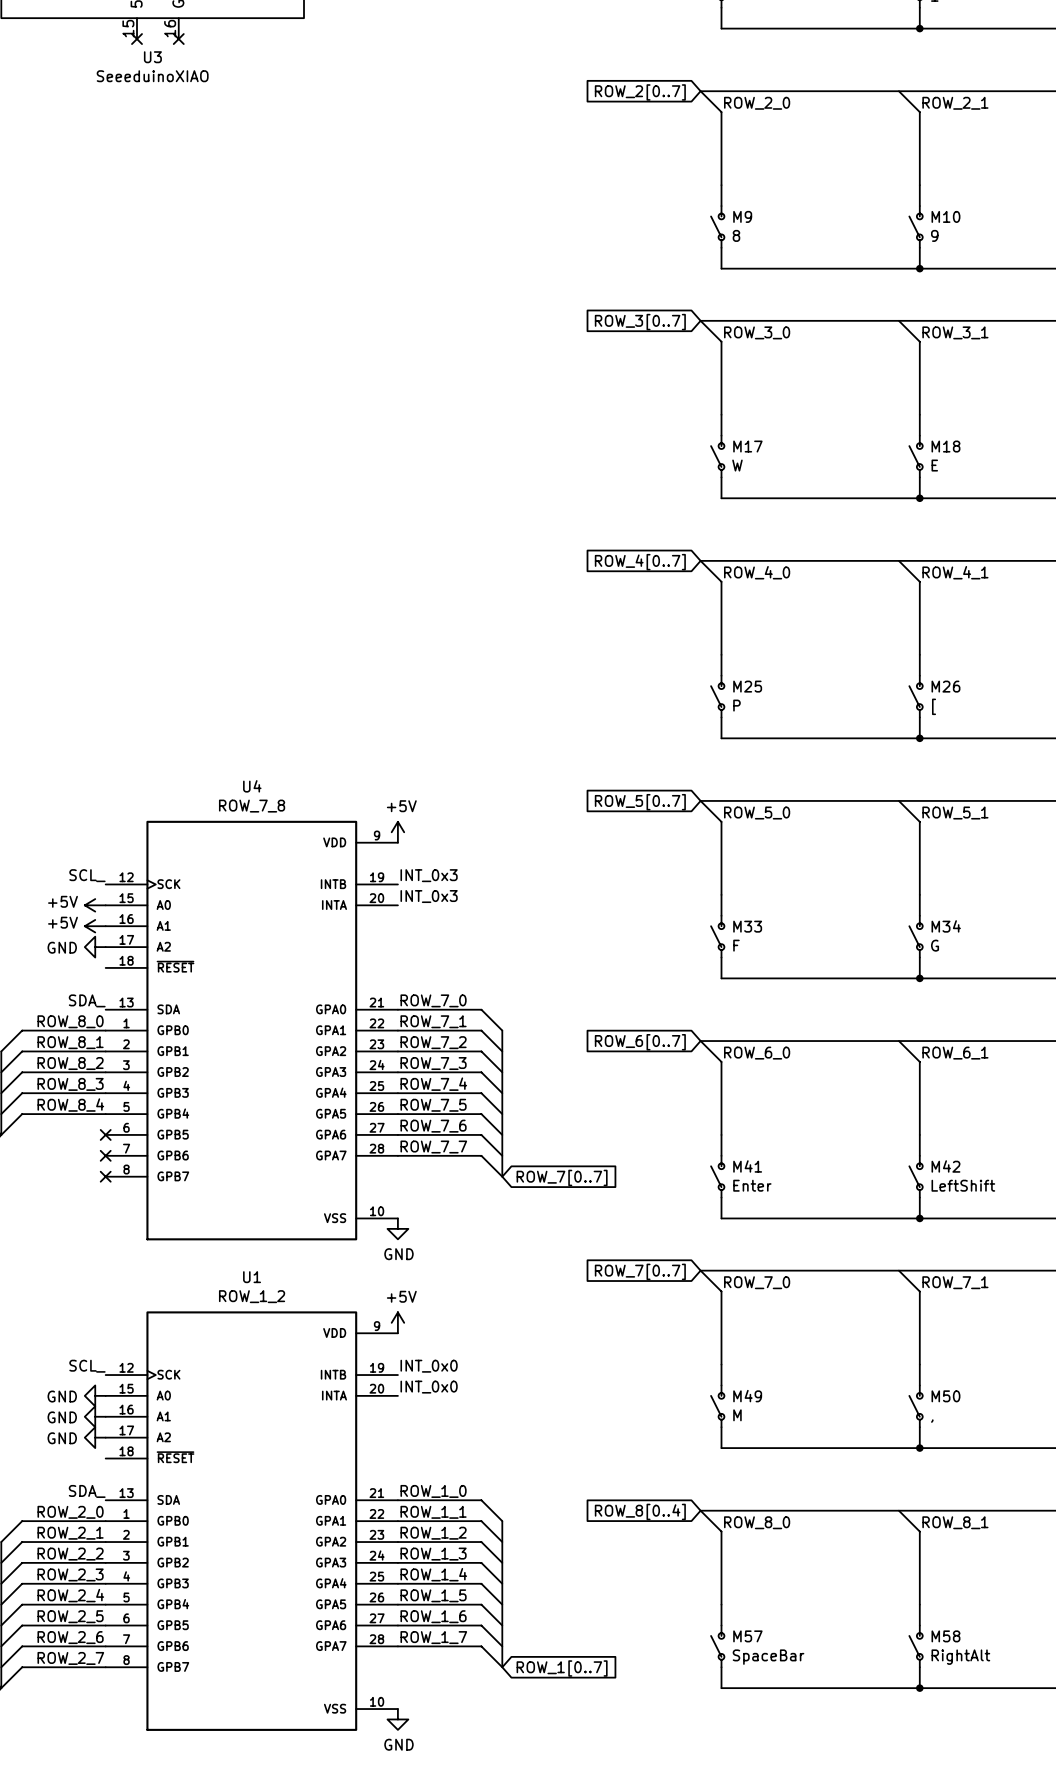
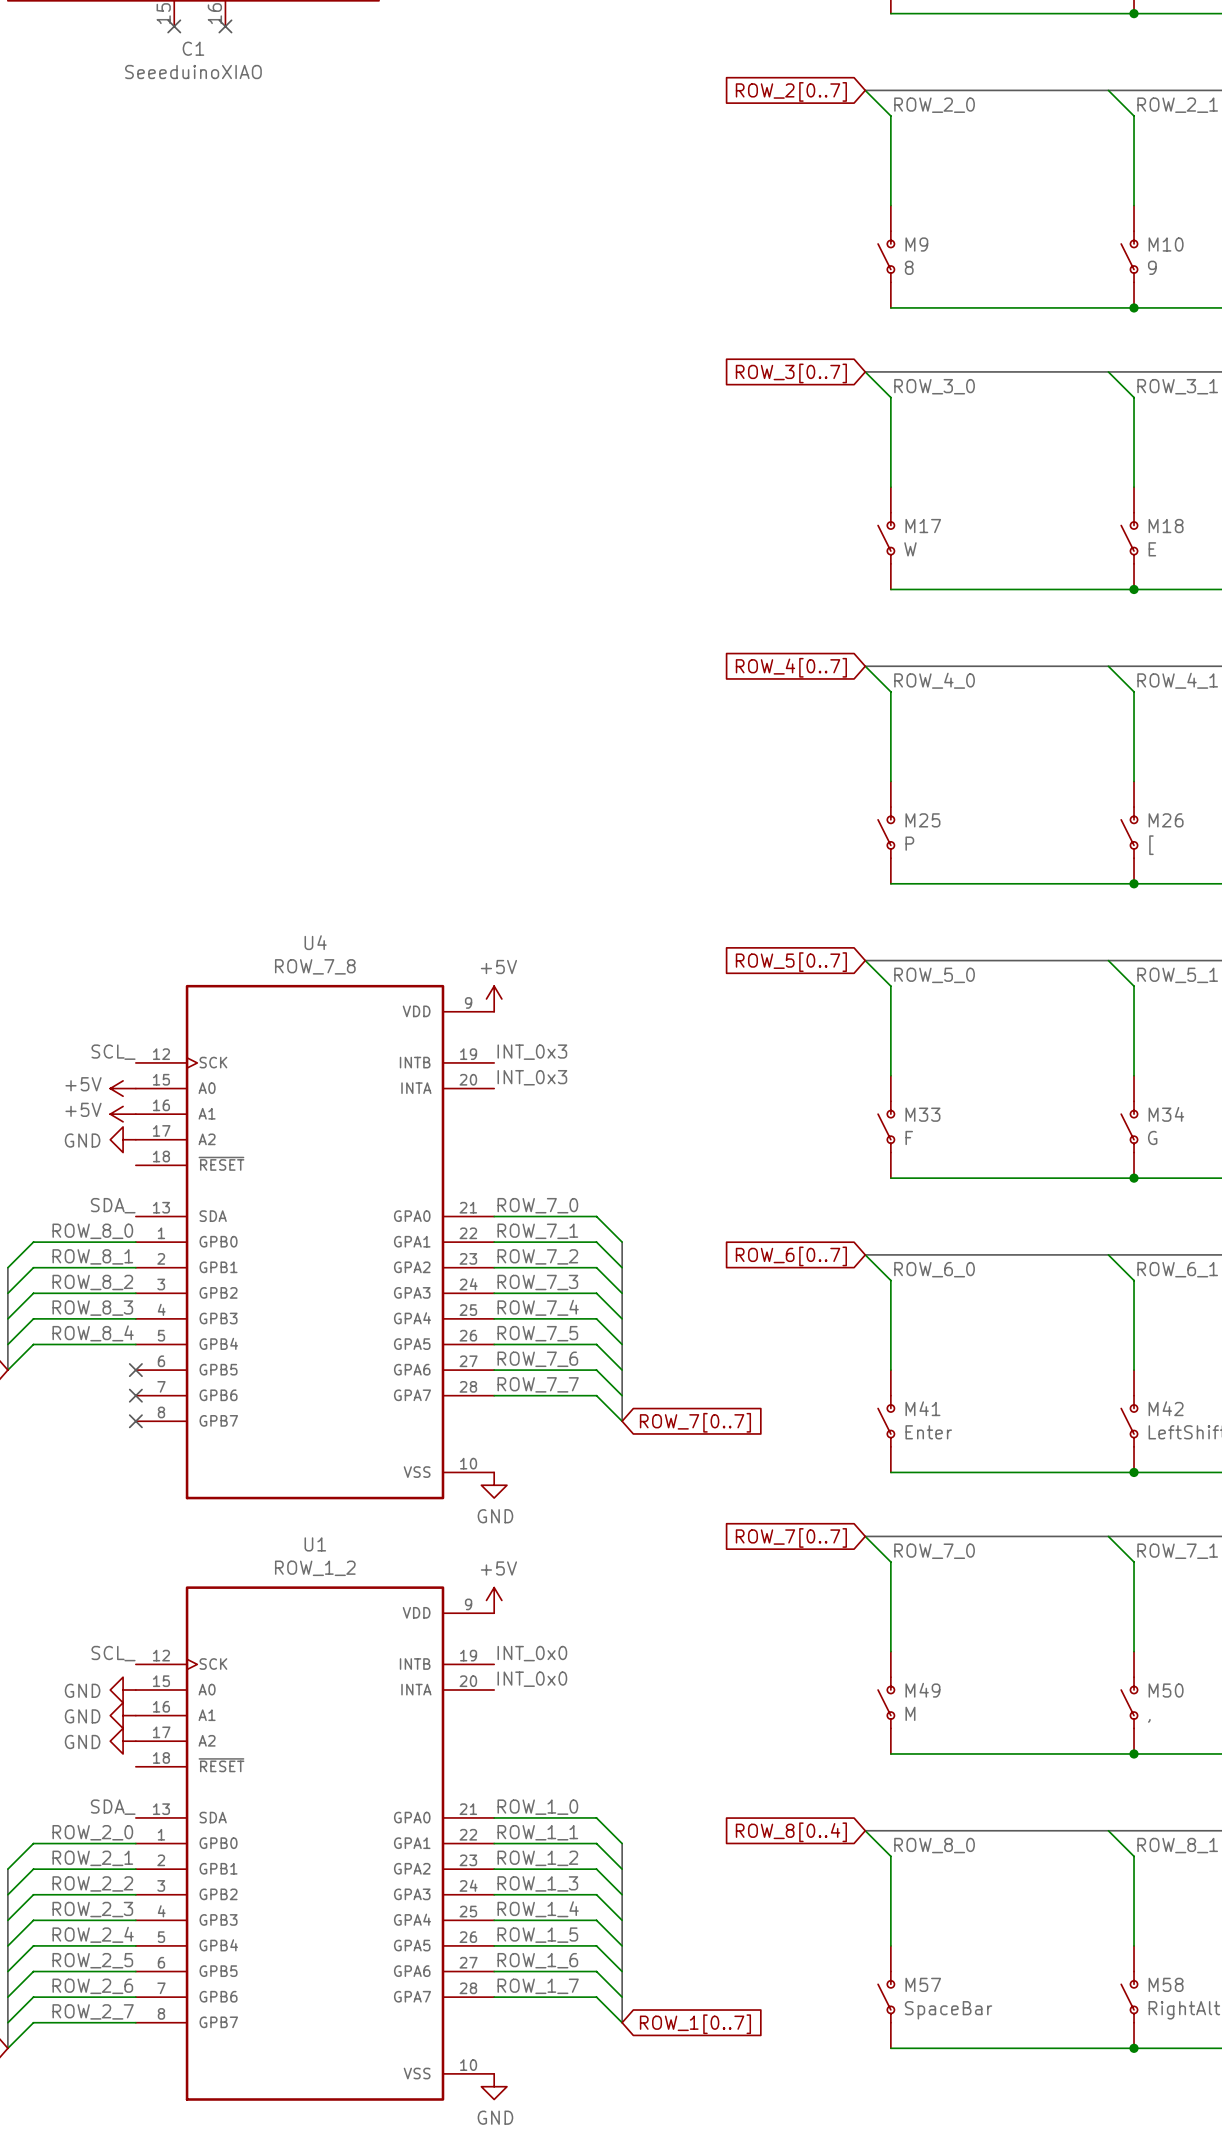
U3 name: U3 (152, 57) -> C1 (193, 48)

